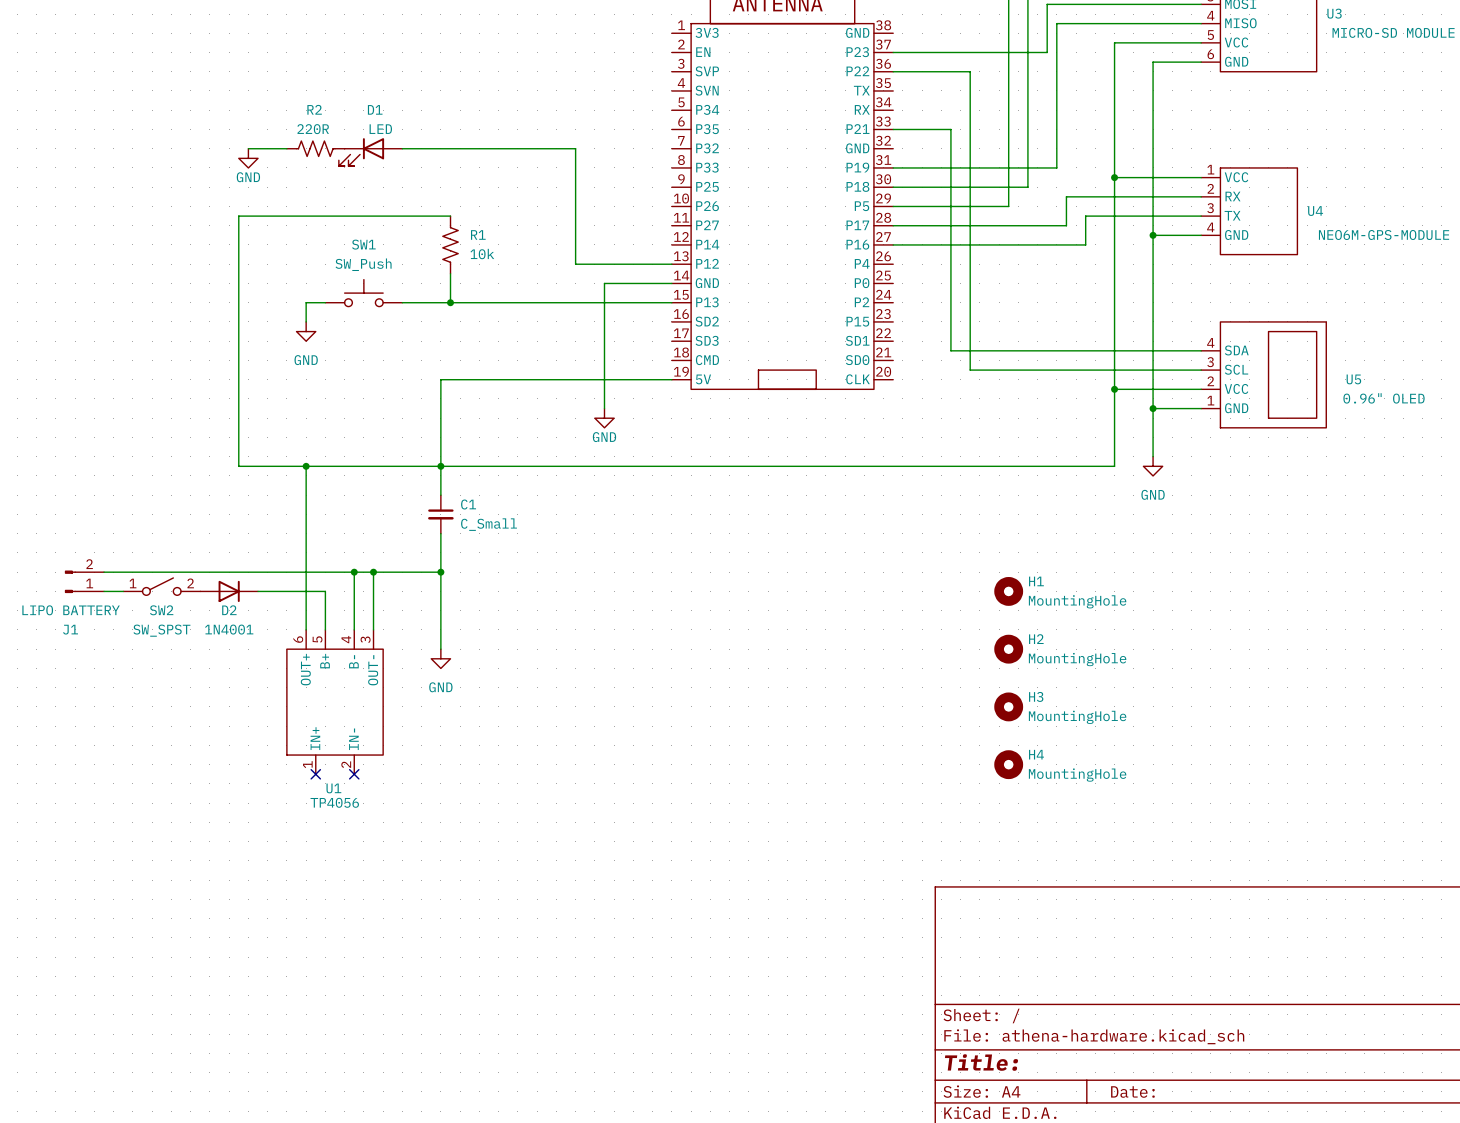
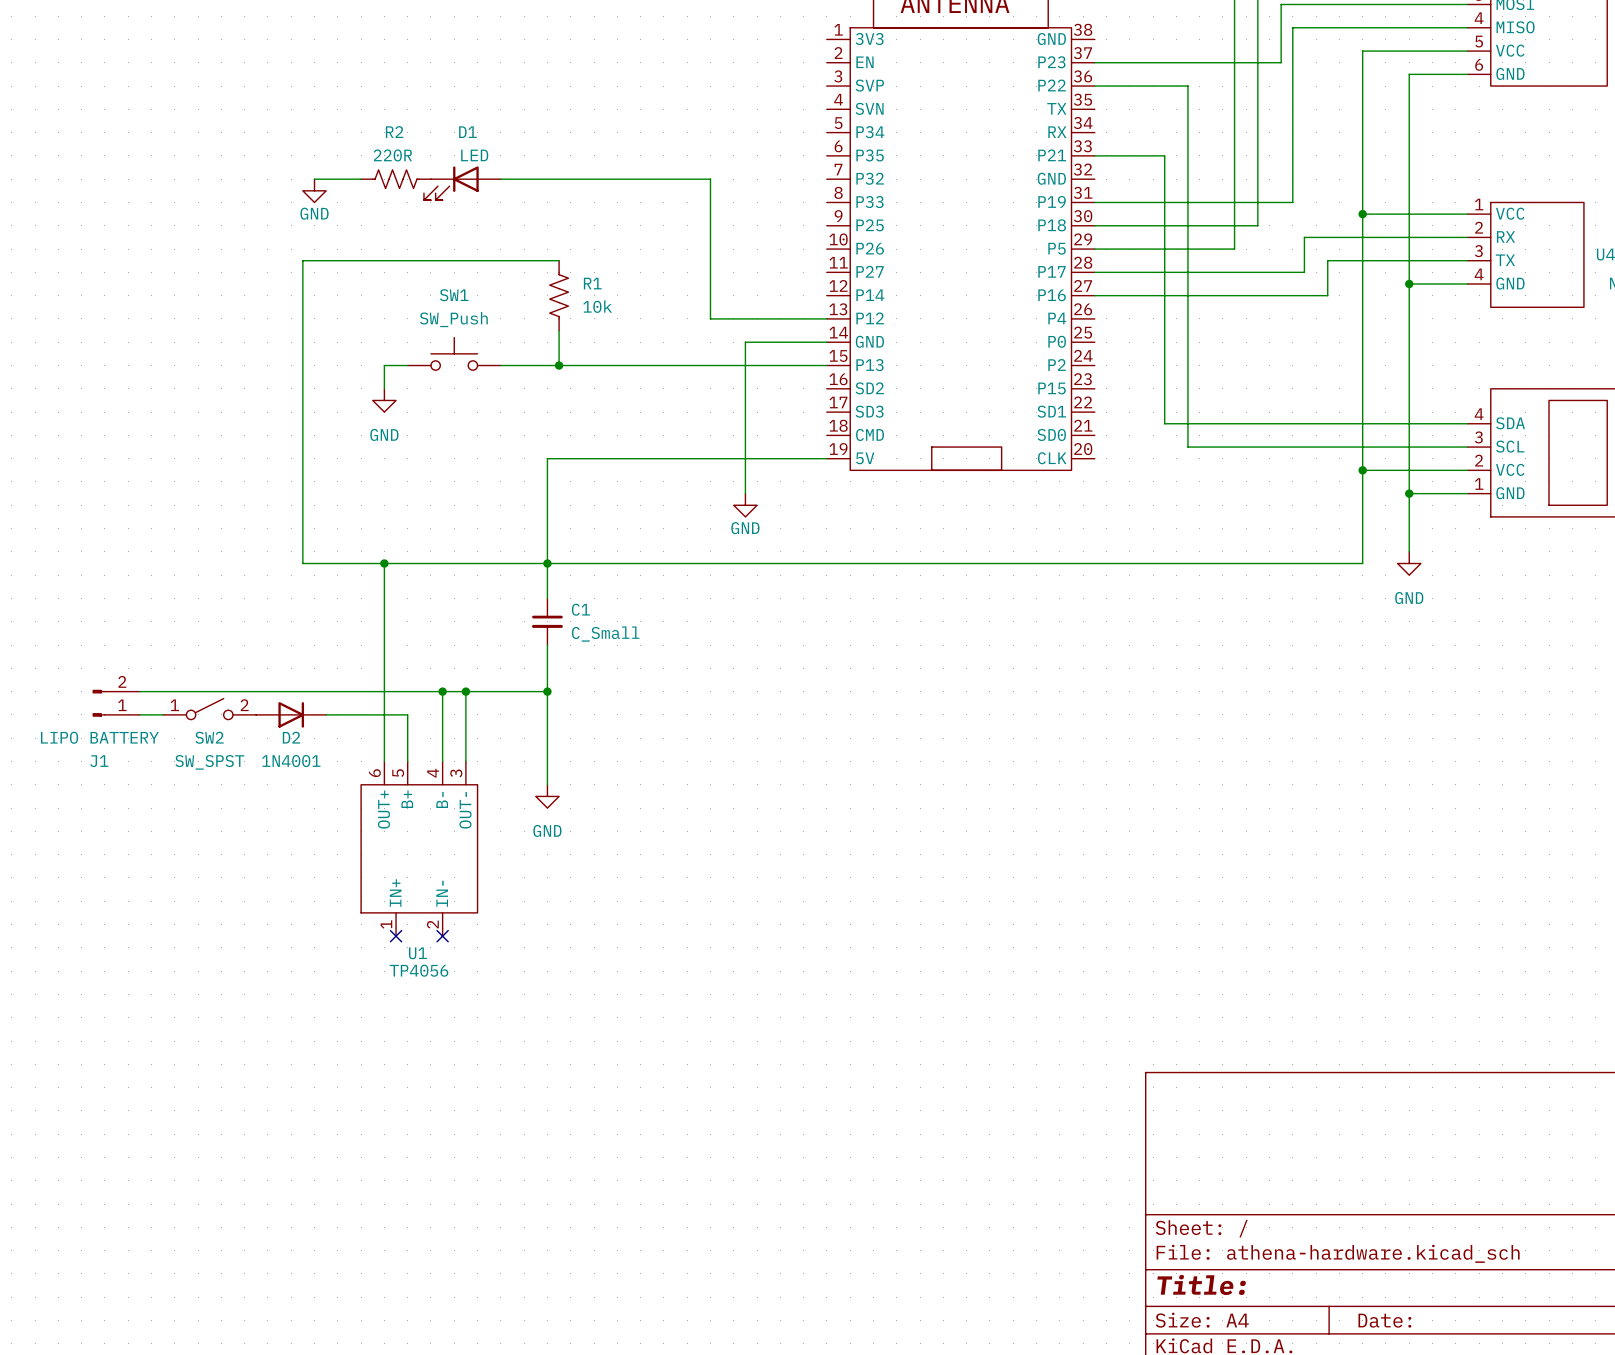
H1: MountingHole (1008, 591) -> none
H2: MountingHole (1008, 649) -> none
H3: MountingHole (1008, 706) -> none
H4: MountingHole (1008, 764) -> none

